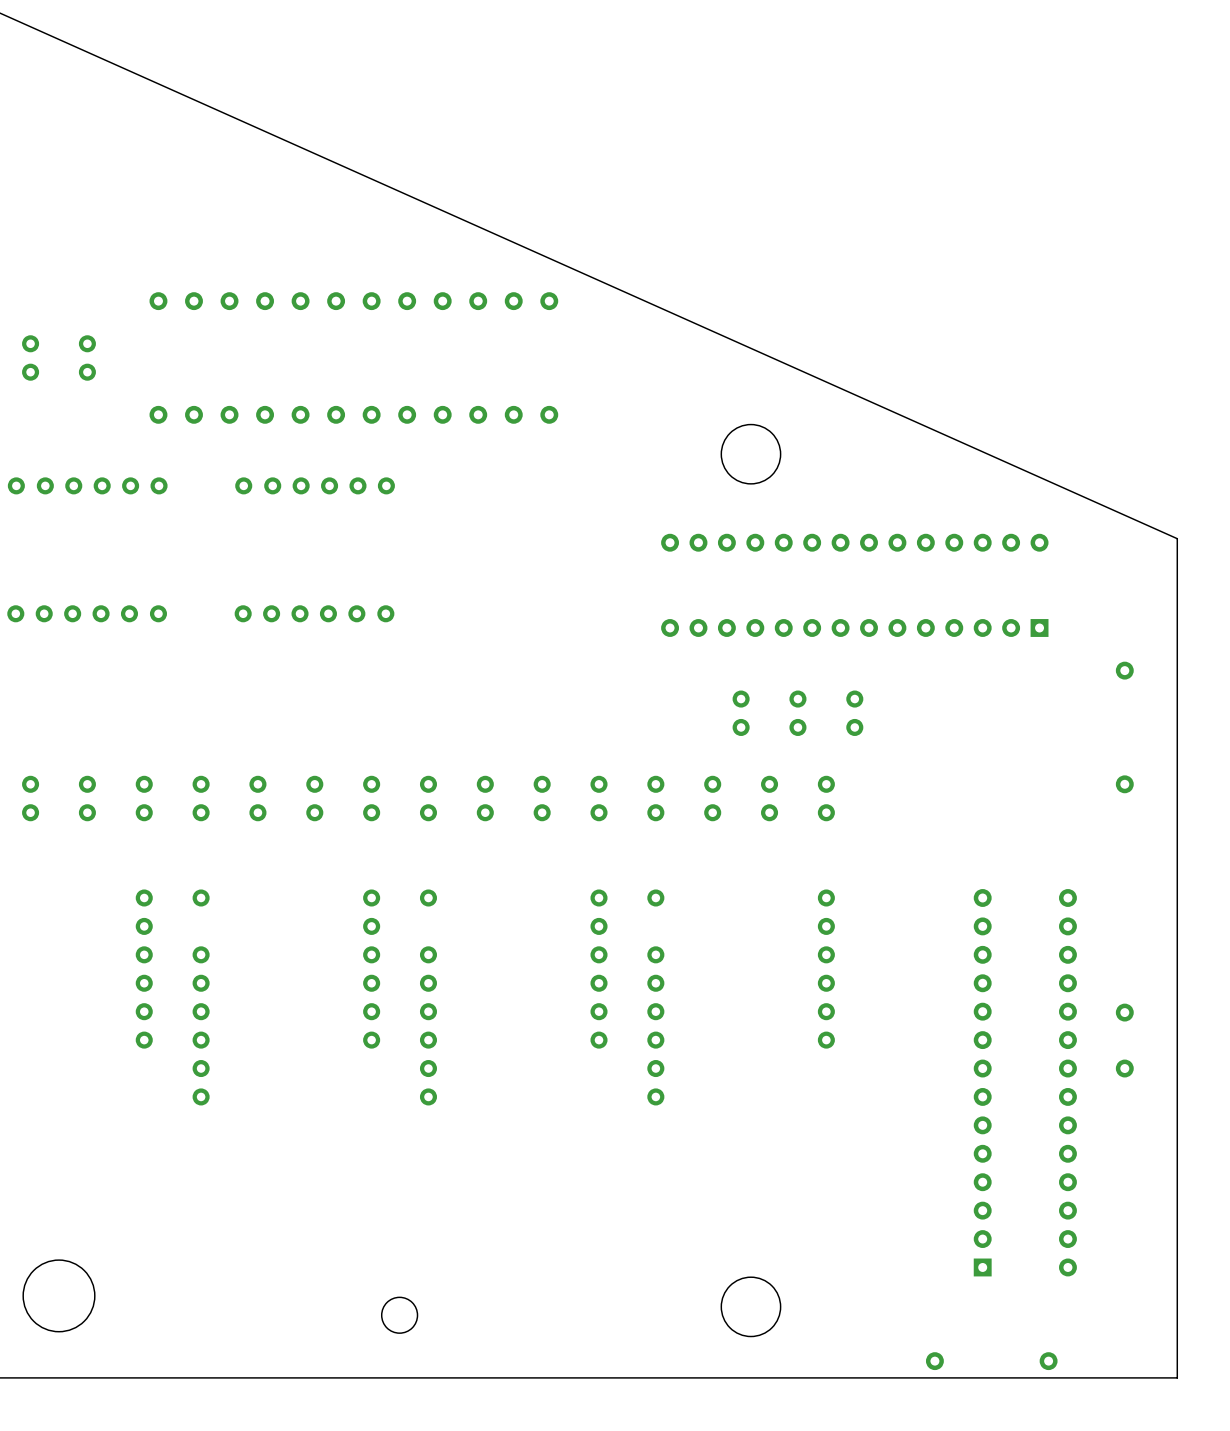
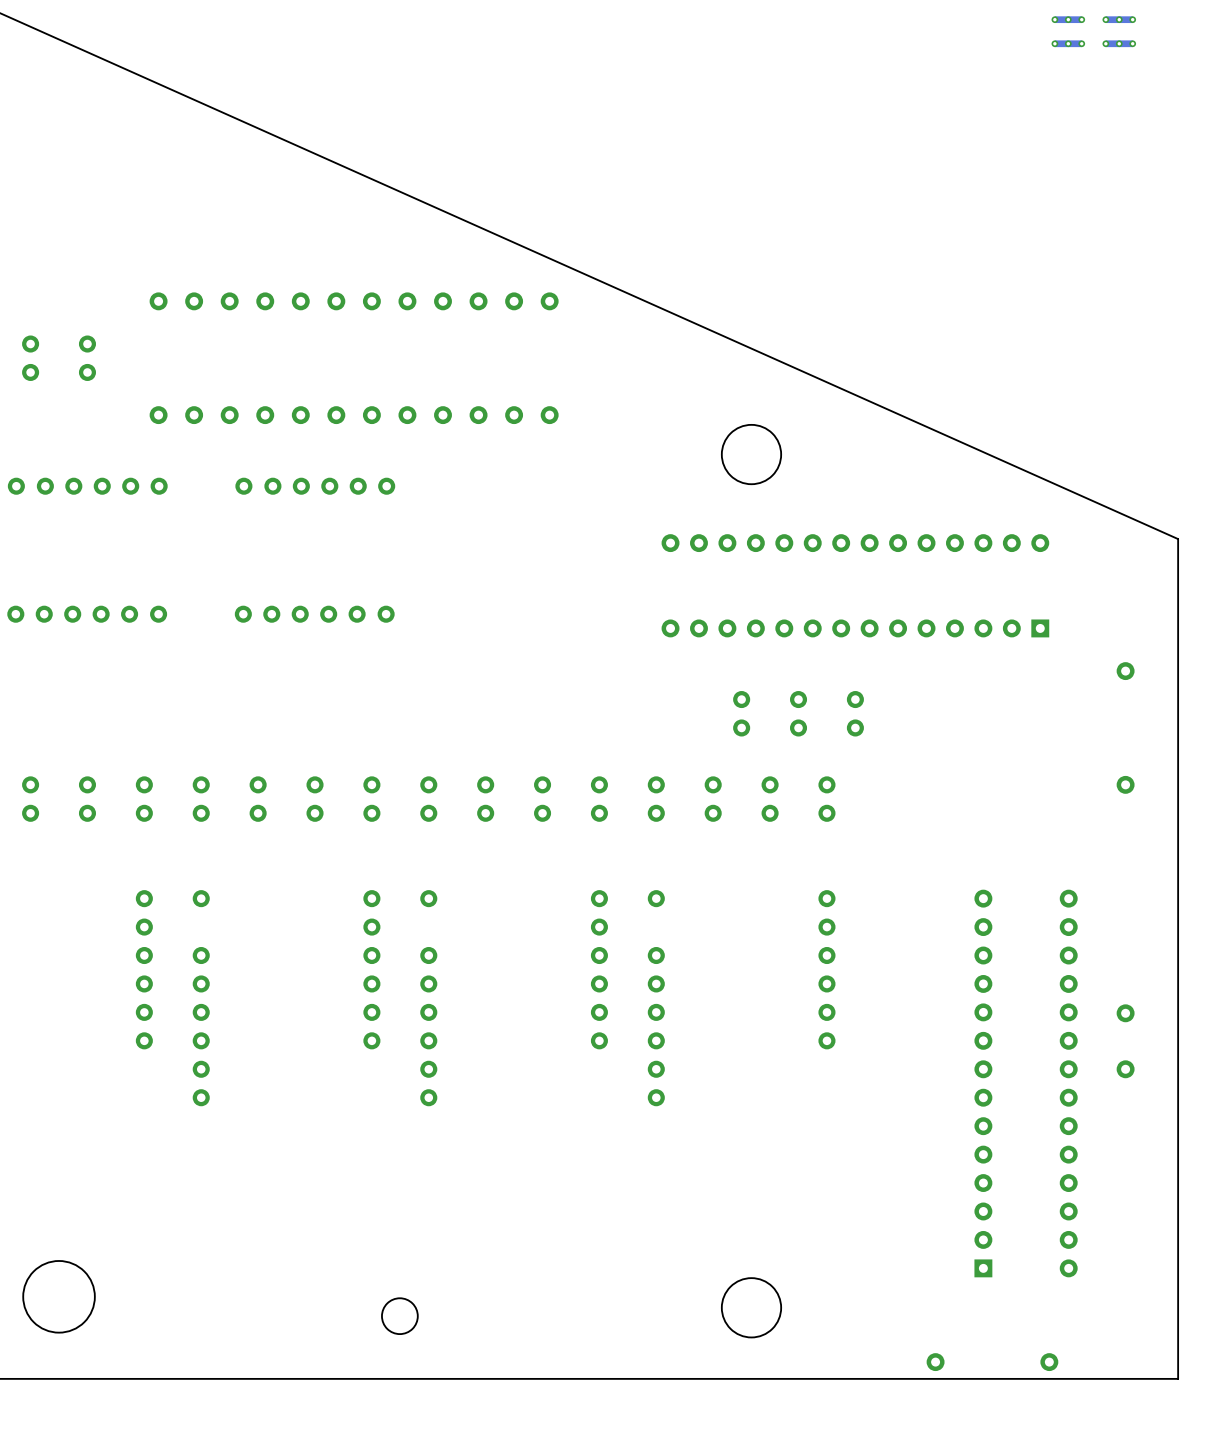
part: none -> (1068, 19)
part: none -> (1119, 19)
part: none -> (1068, 43)
part: none -> (1119, 43)

